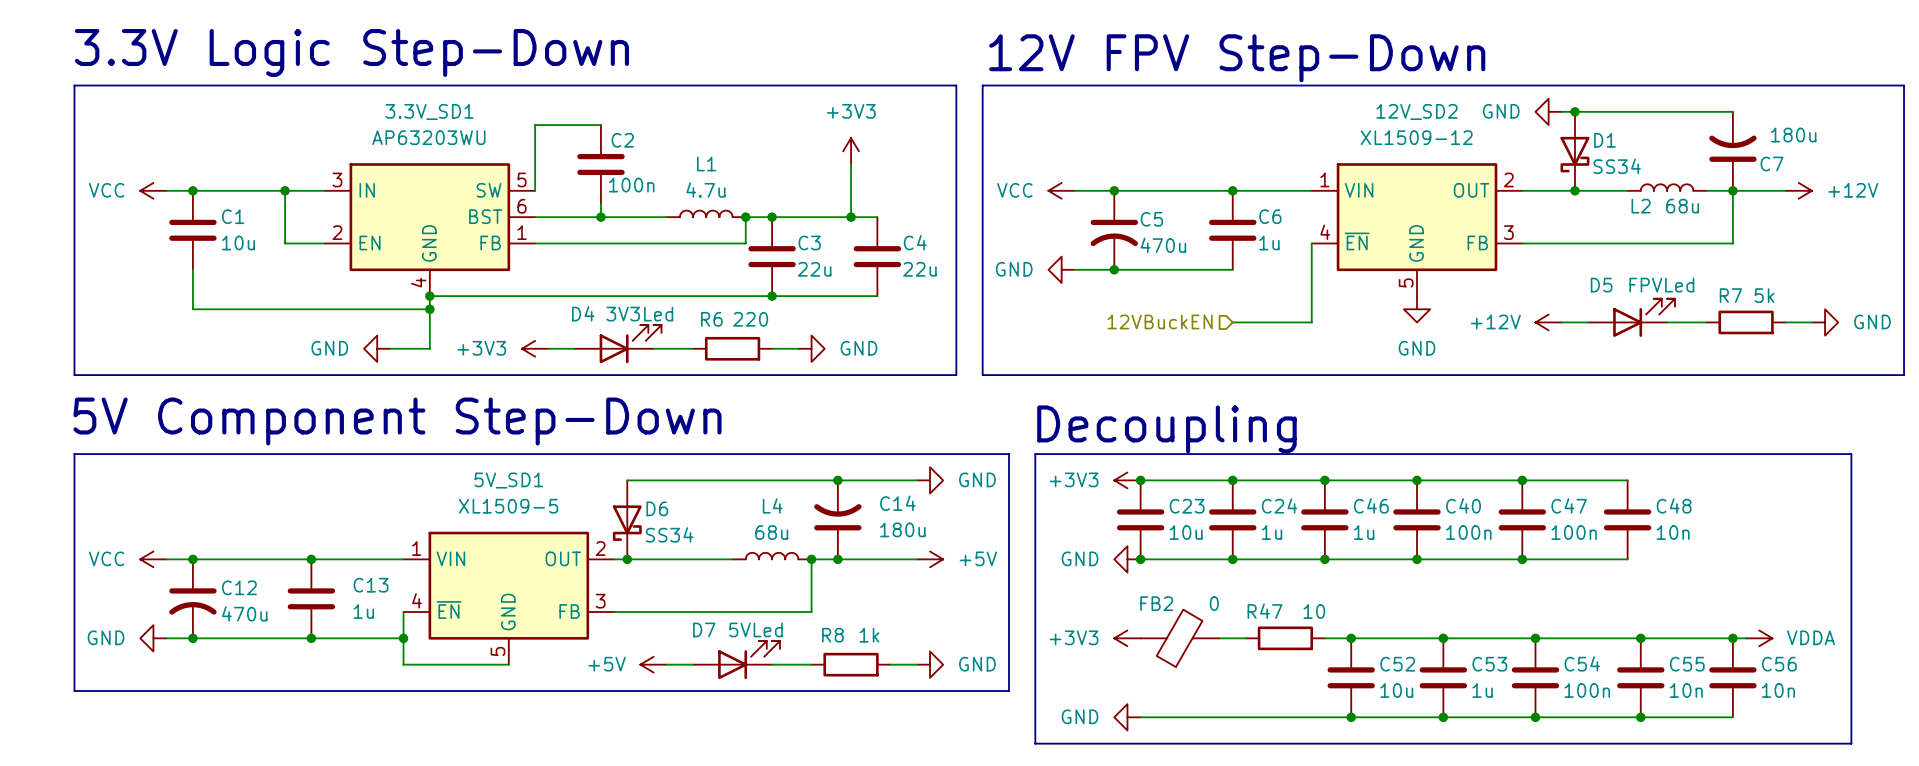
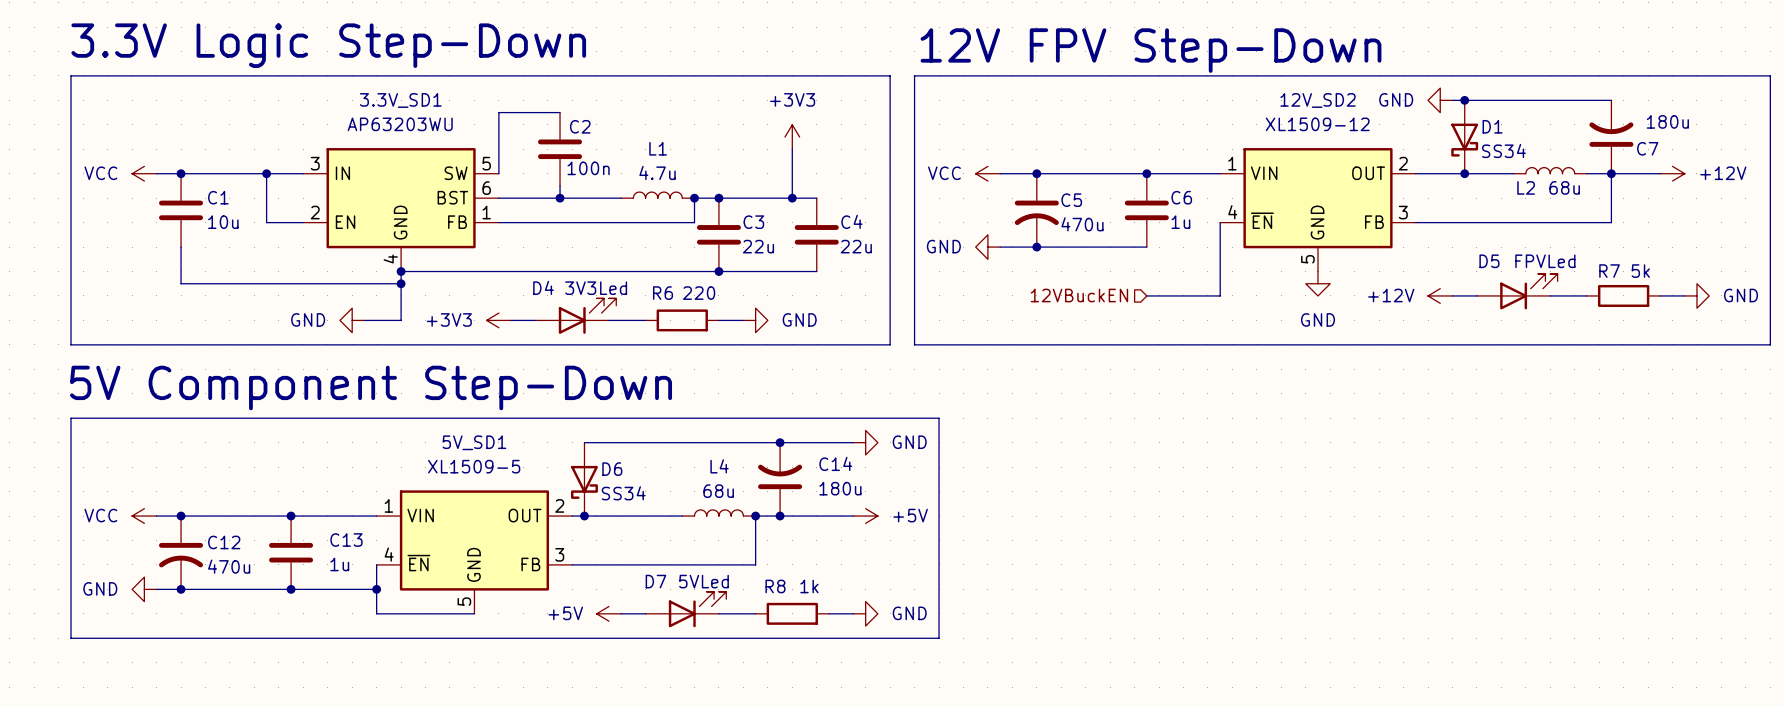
text: Decoupling (1166, 429) -> none
line: (1035, 454) (1851, 454) (1851, 743) (1035, 743) (1035, 454) -> none
power symbol: +3V3 (1127, 480) -> none
wire: (1140, 480) (1627, 480) -> none
junction: (1140, 480) -> none
junction: (1232, 480) -> none
junction: (1324, 480) -> none
junction: (1417, 480) -> none
junction: (1522, 480) -> none
C23: 10u (1140, 519) -> none
C24: 1u (1232, 519) -> none
C46: 1u (1324, 519) -> none
C40: 100n (1417, 519) -> none
C47: 100n (1522, 519) -> none
C48: 10n (1627, 519) -> none
power symbol: GND (1127, 559) -> none
wire: (1140, 559) (1627, 559) -> none
junction: (1140, 559) -> none
junction: (1232, 559) -> none
junction: (1324, 559) -> none
junction: (1417, 559) -> none
junction: (1522, 559) -> none
power symbol: +3V3 (1127, 638) -> none
FB2: 0 (1180, 638) -> none
wire: (1219, 638) (1245, 638) -> none
R47: 10 (1285, 638) -> none
wire: (1324, 638) (1746, 638) -> none
junction: (1351, 638) -> none
junction: (1443, 638) -> none
junction: (1535, 638) -> none
junction: (1640, 638) -> none
junction: (1732, 638) -> none
power symbol: VDDA (1759, 638) -> none
C52: 10u (1351, 677) -> none
C53: 1u (1443, 677) -> none
C54: 100n (1535, 677) -> none
C55: 10n (1640, 677) -> none
C56: 10n (1732, 677) -> none
power symbol: GND (1127, 717) -> none
wire: (1140, 717) (1732, 717) -> none
junction: (1351, 717) -> none
junction: (1443, 717) -> none
junction: (1535, 717) -> none
junction: (1640, 717) -> none

